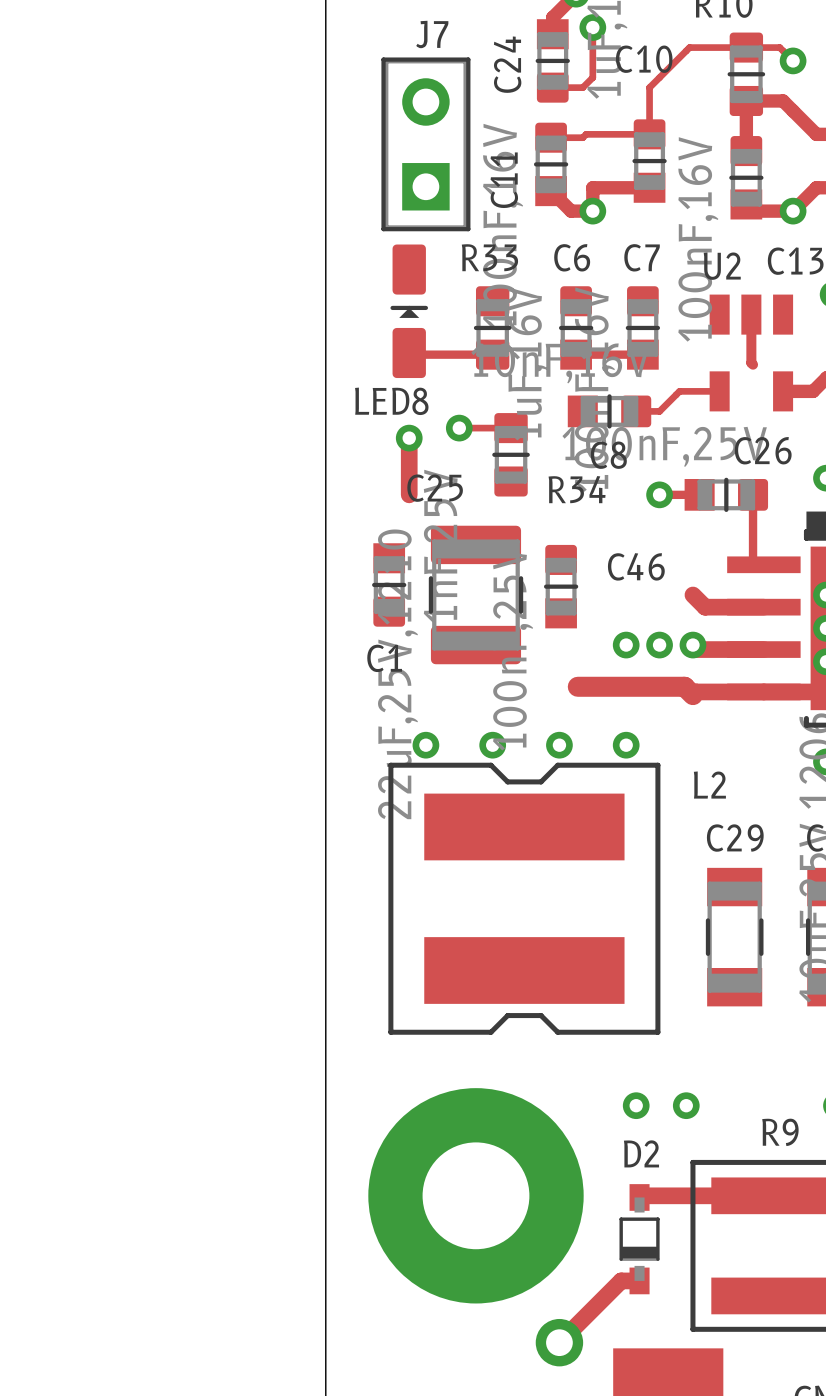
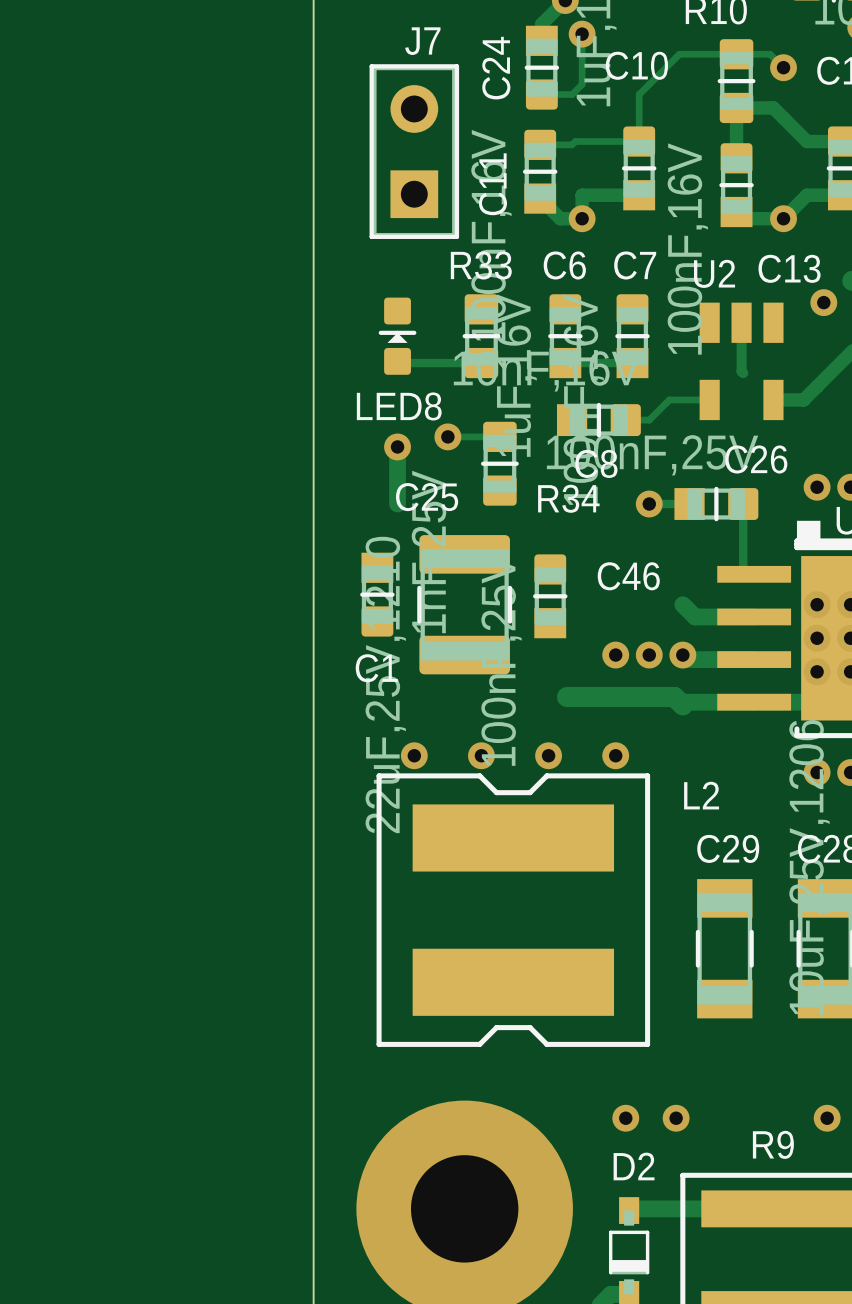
LED8 footprint: [390, 244, 429, 379] -> [378, 297, 417, 375]

